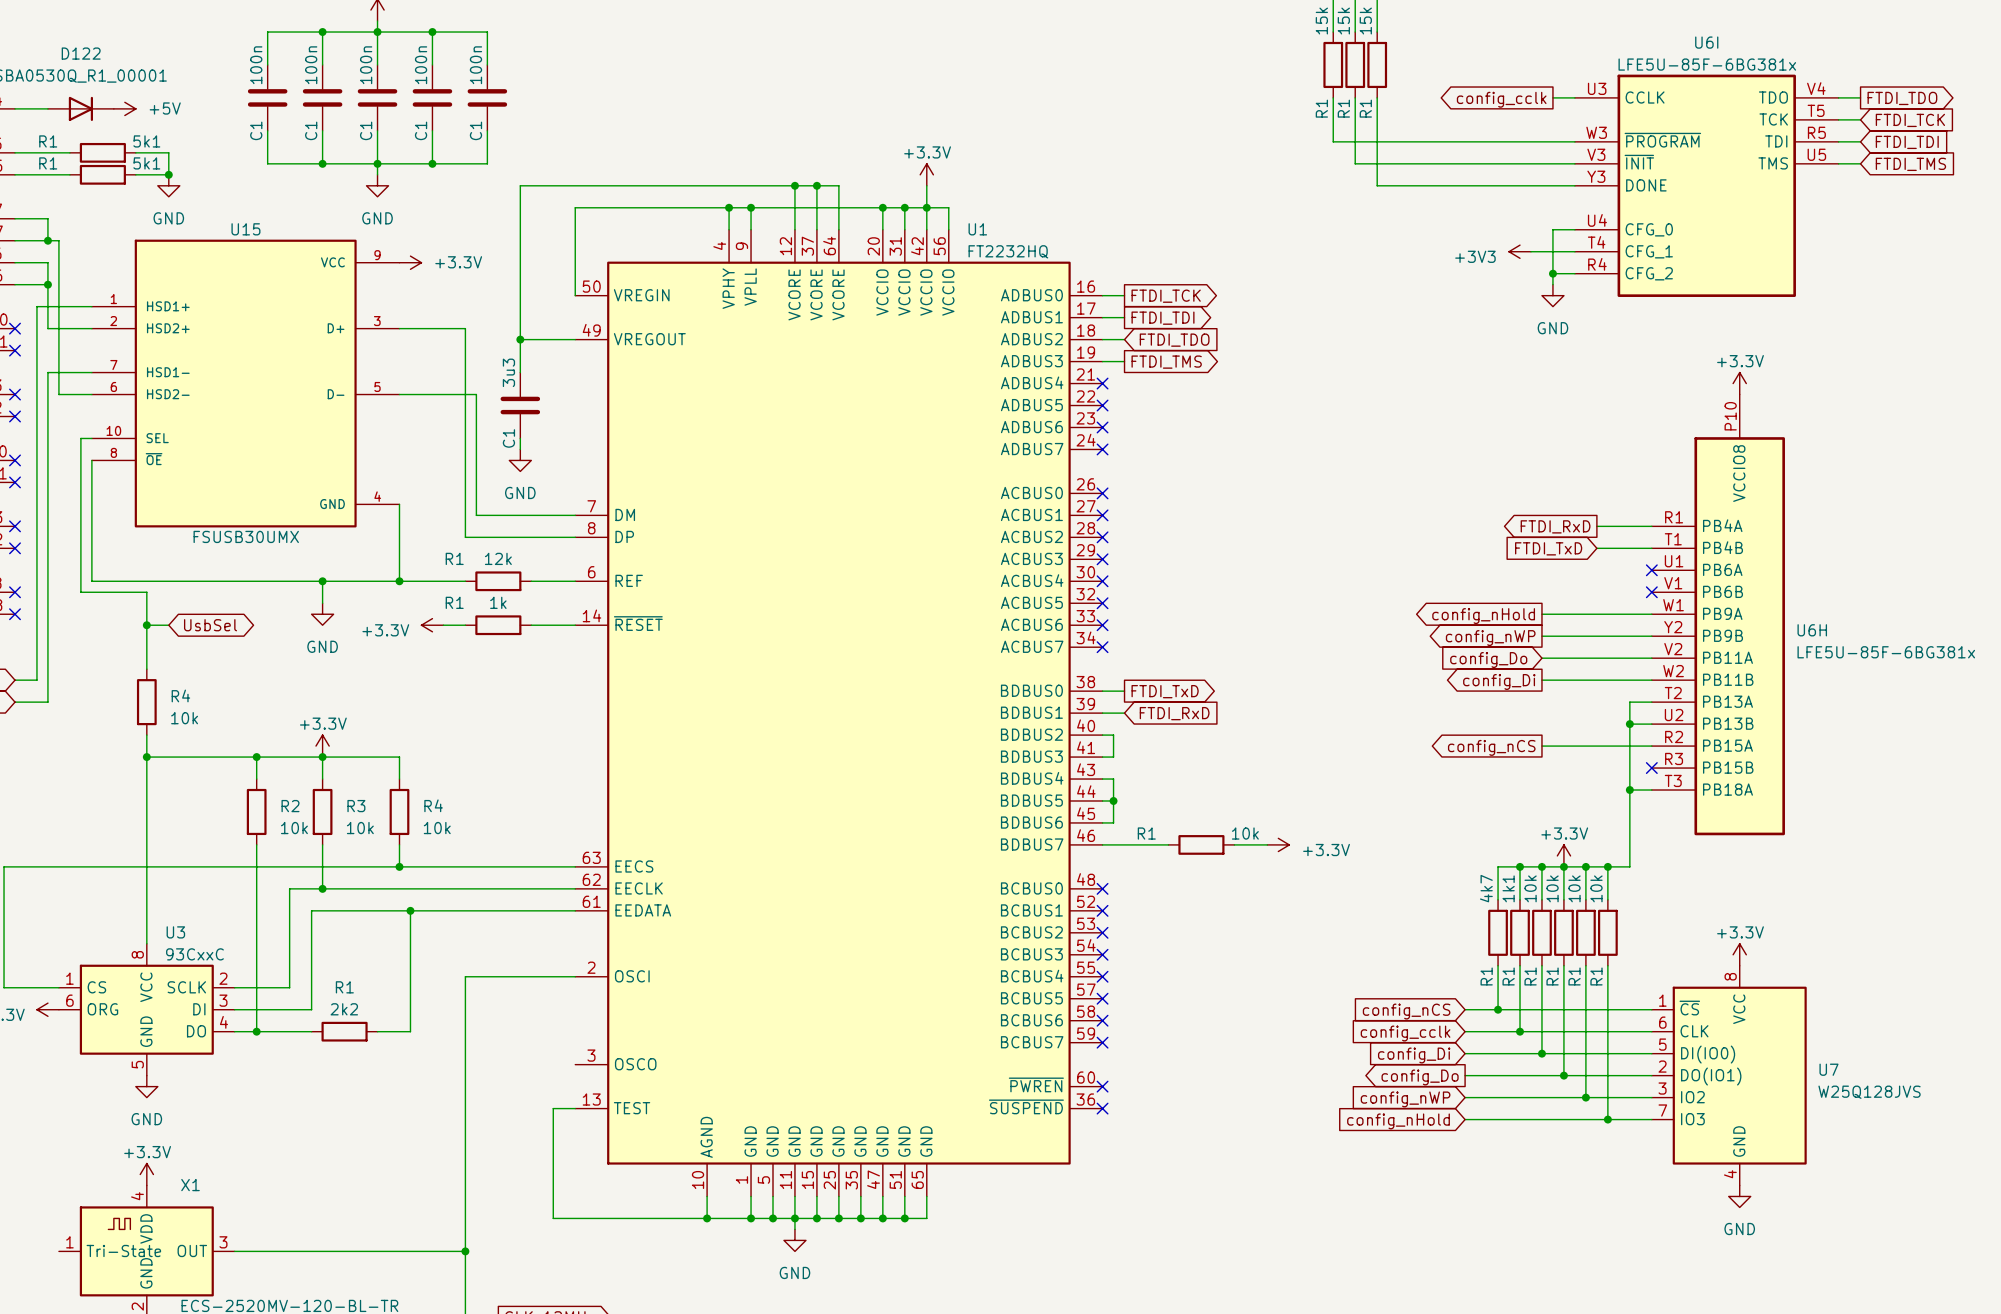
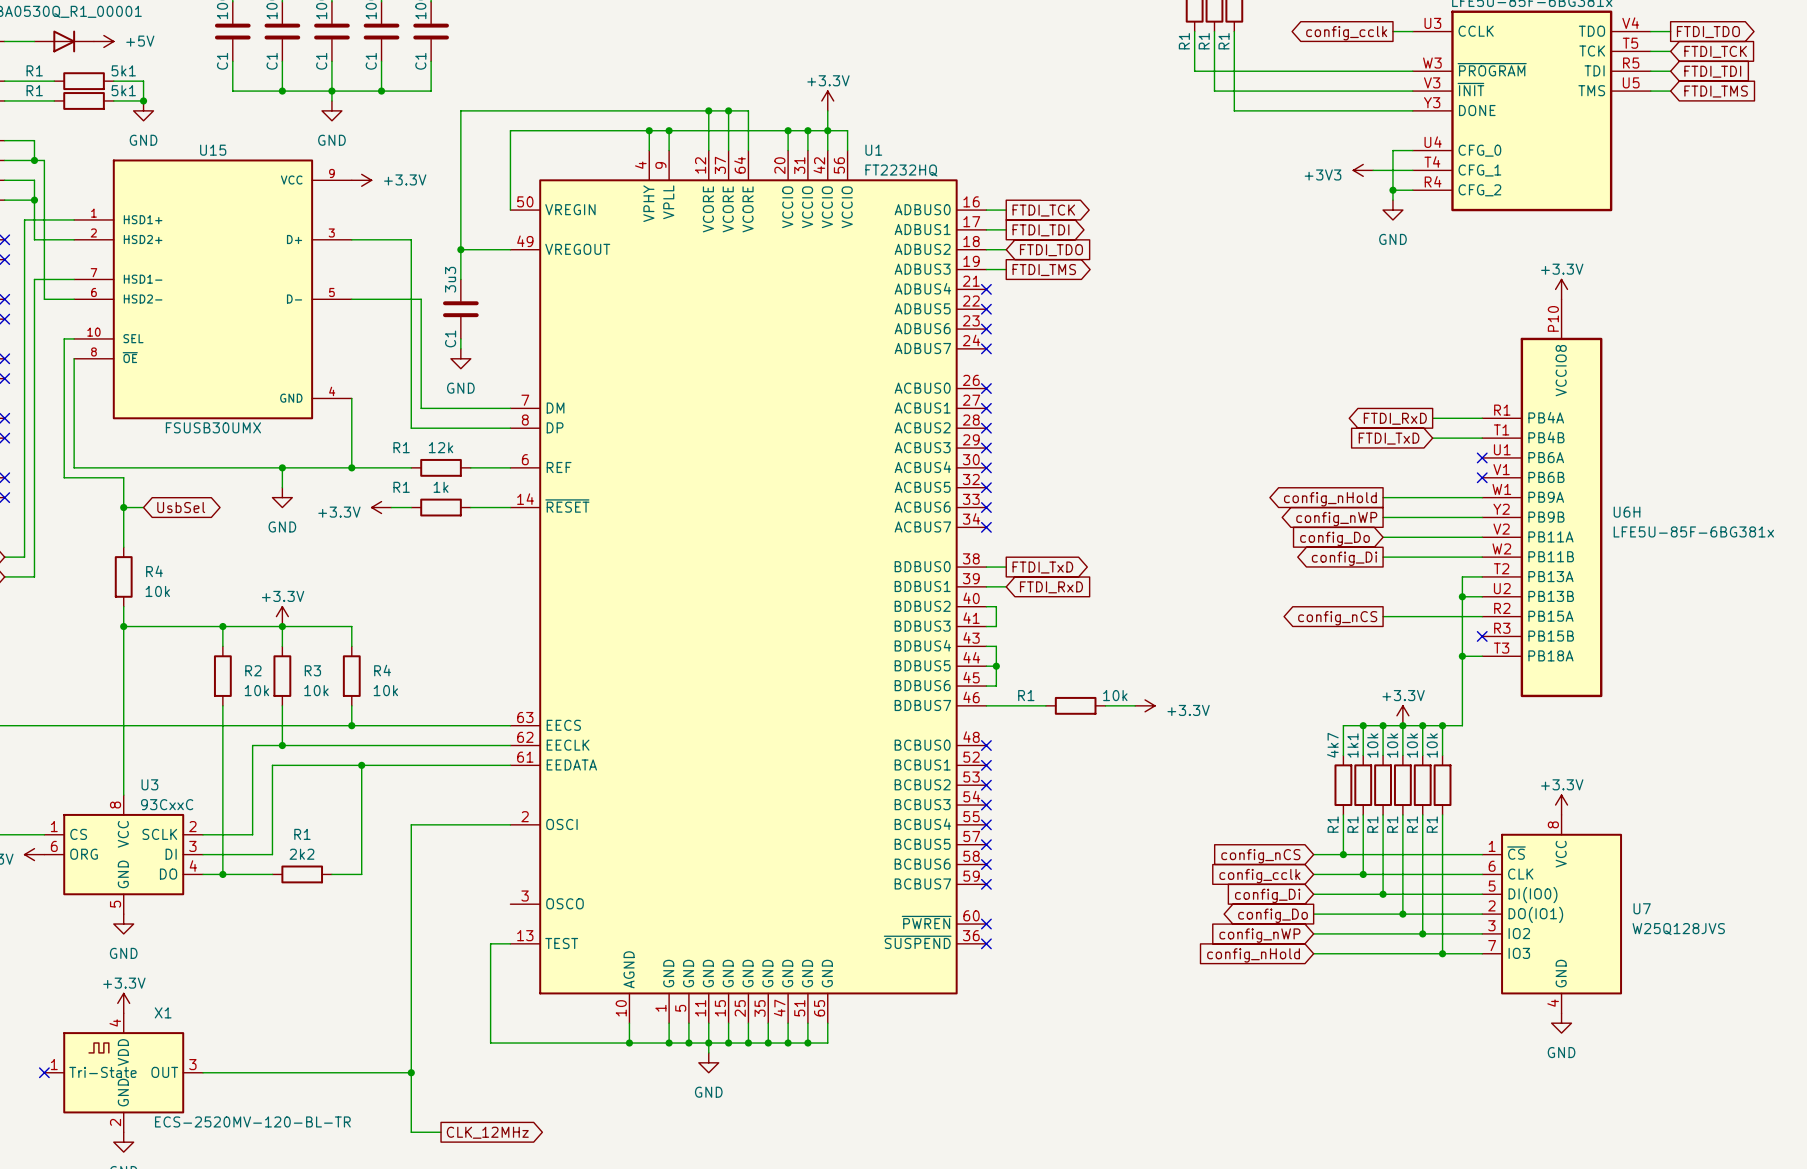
no-connect mark: none -> (44, 1072)

